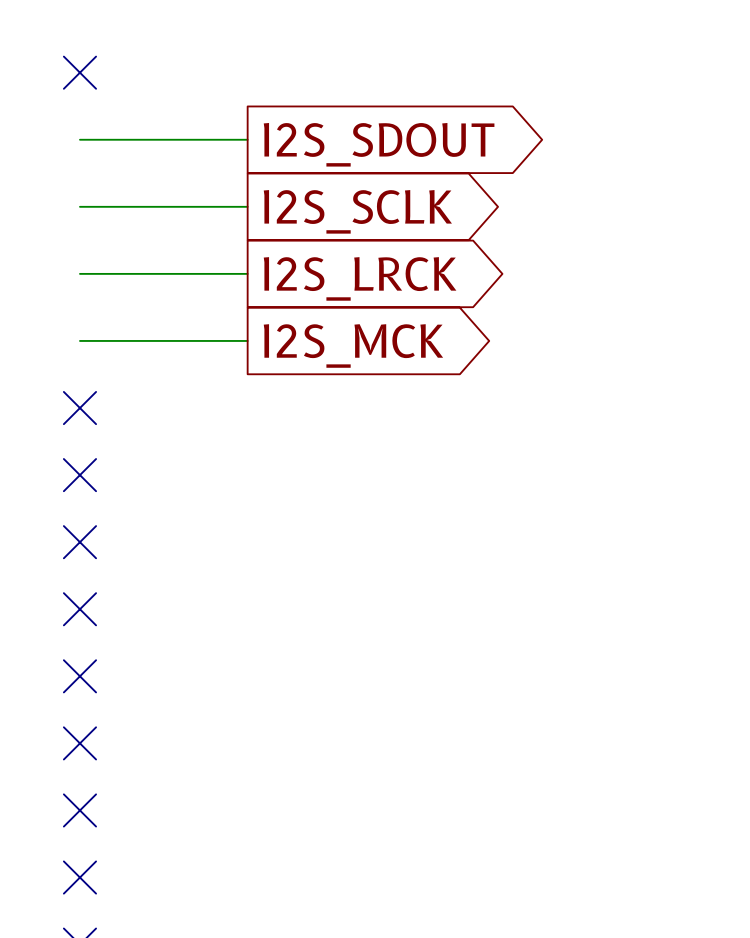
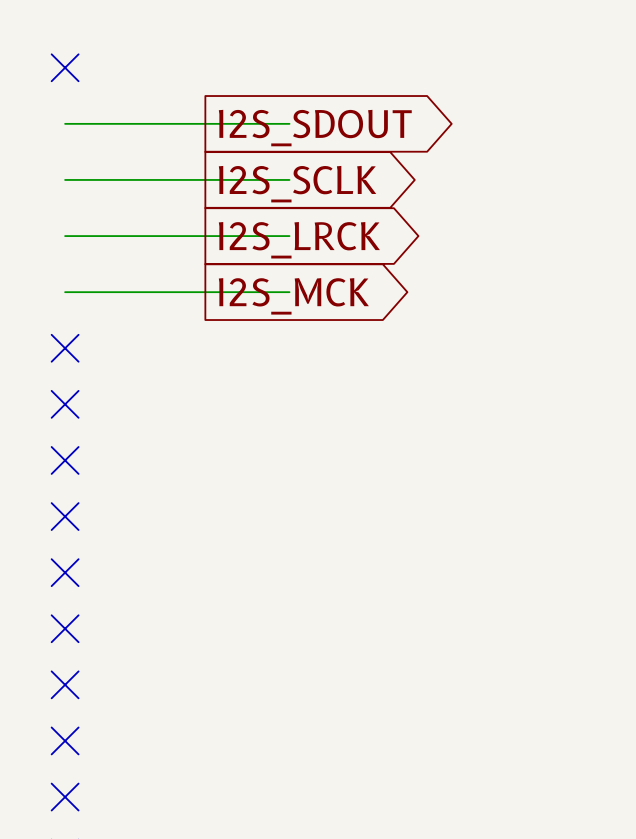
wire: none -> (205, 123) (289, 123)
wire: none -> (205, 179) (289, 179)
wire: none -> (205, 236) (289, 236)
wire: none -> (205, 292) (289, 292)

